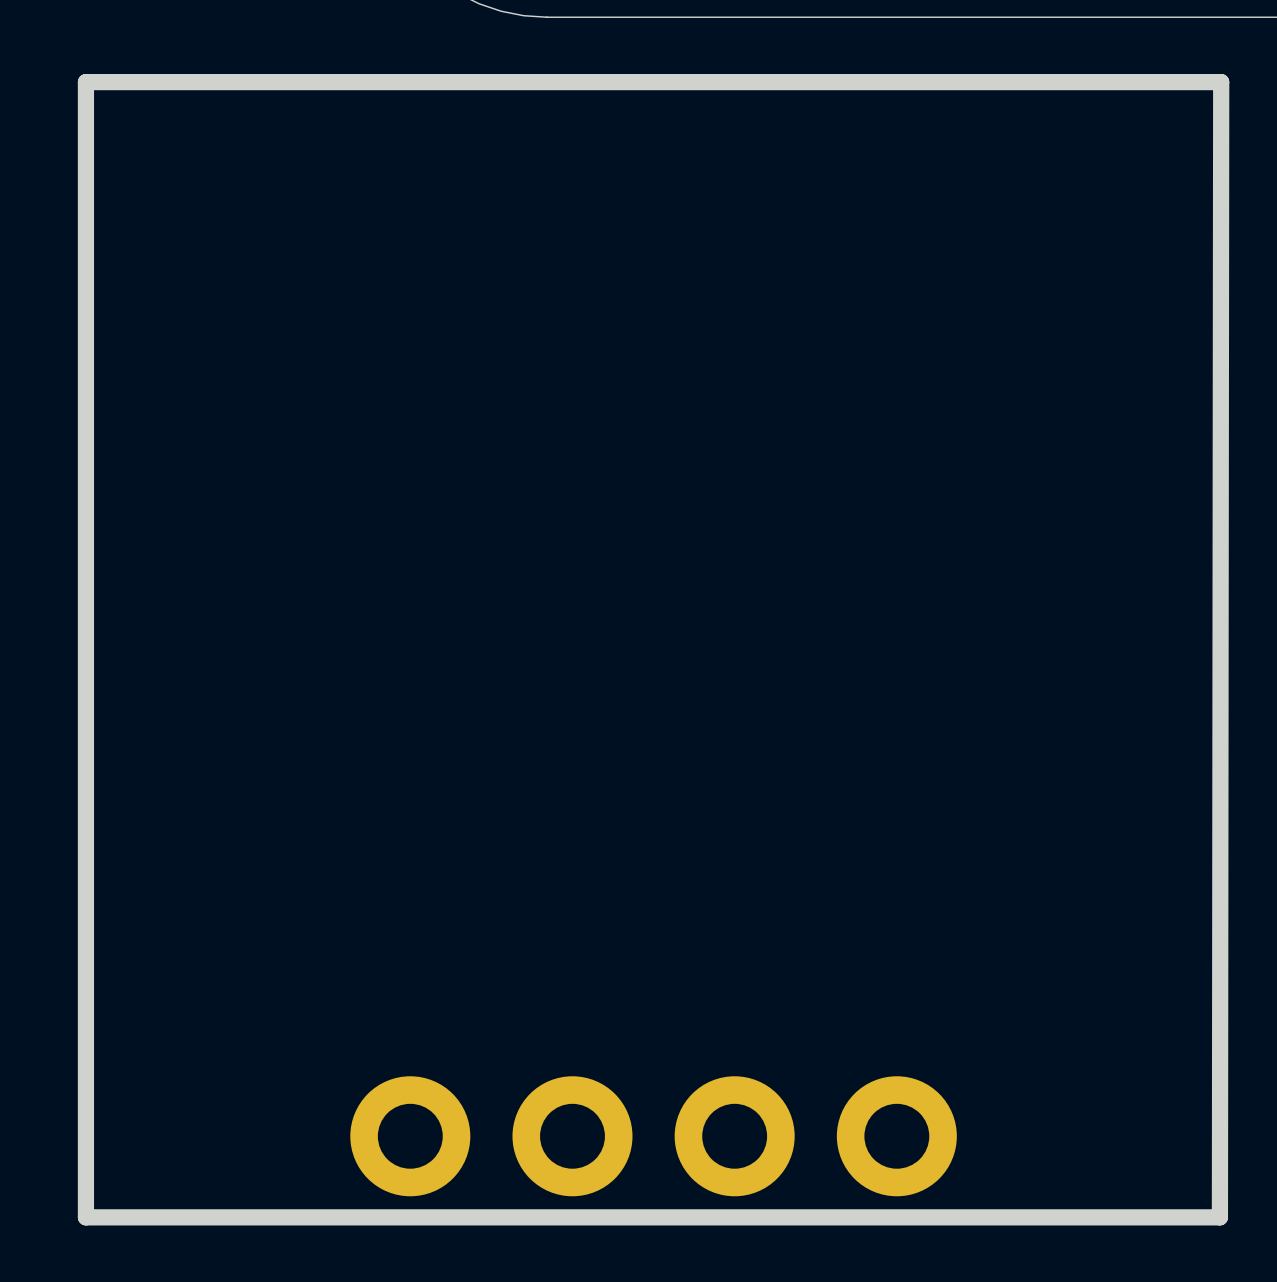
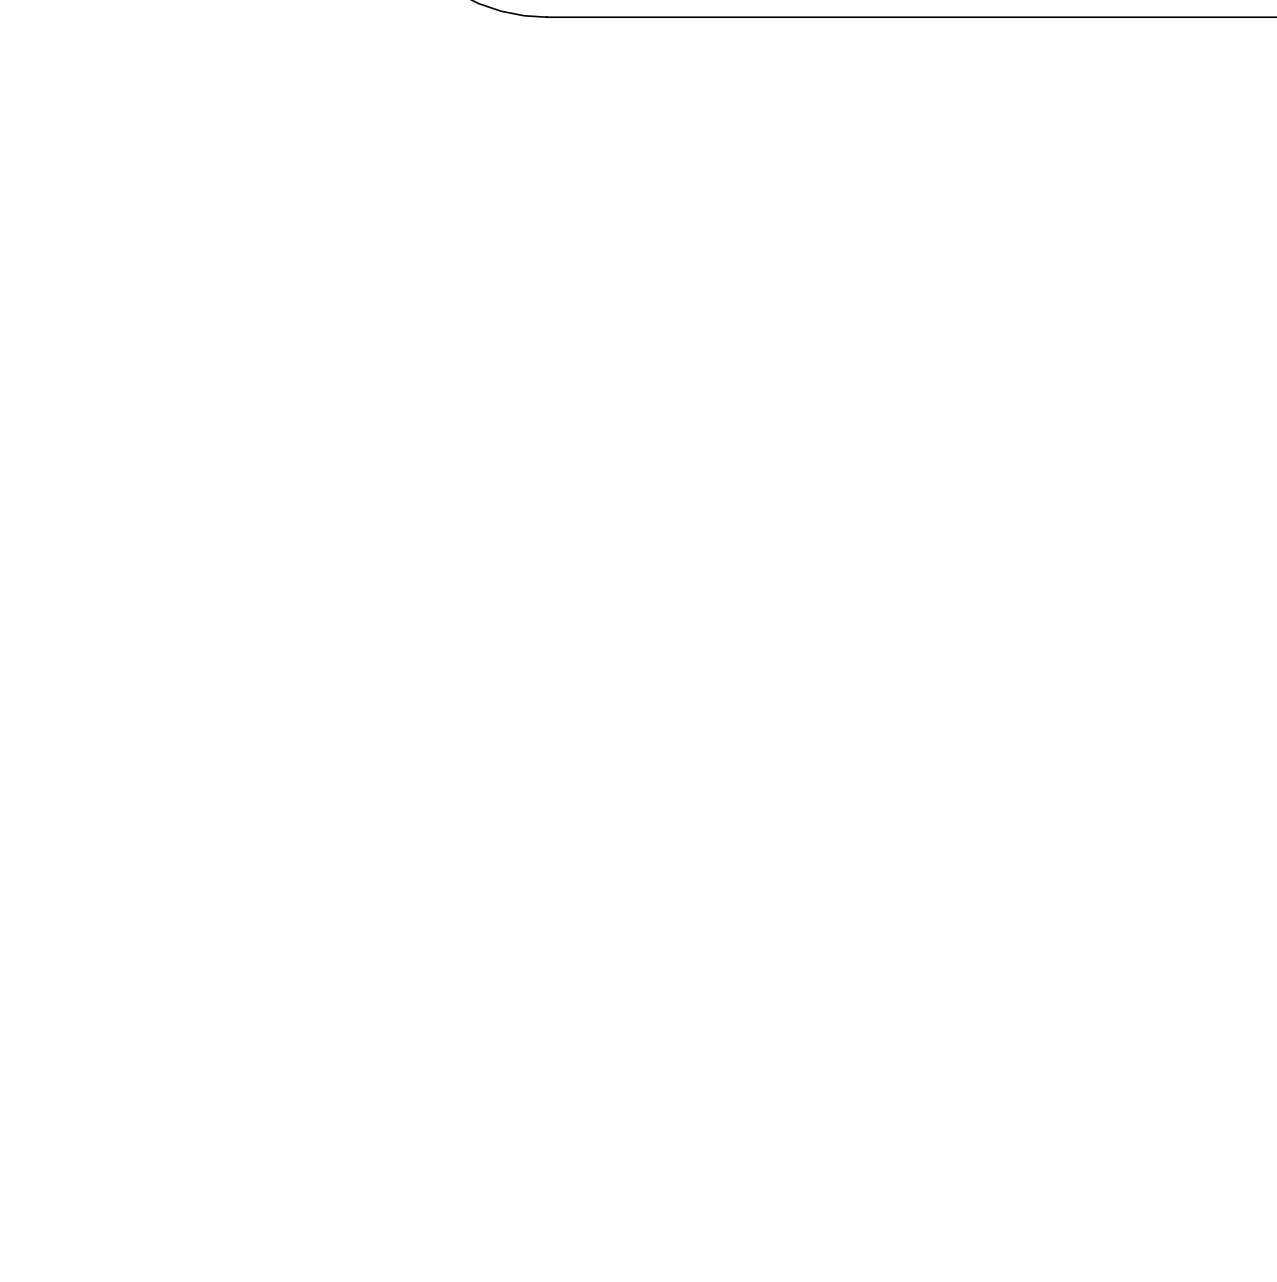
part: (653, 649) -> none

